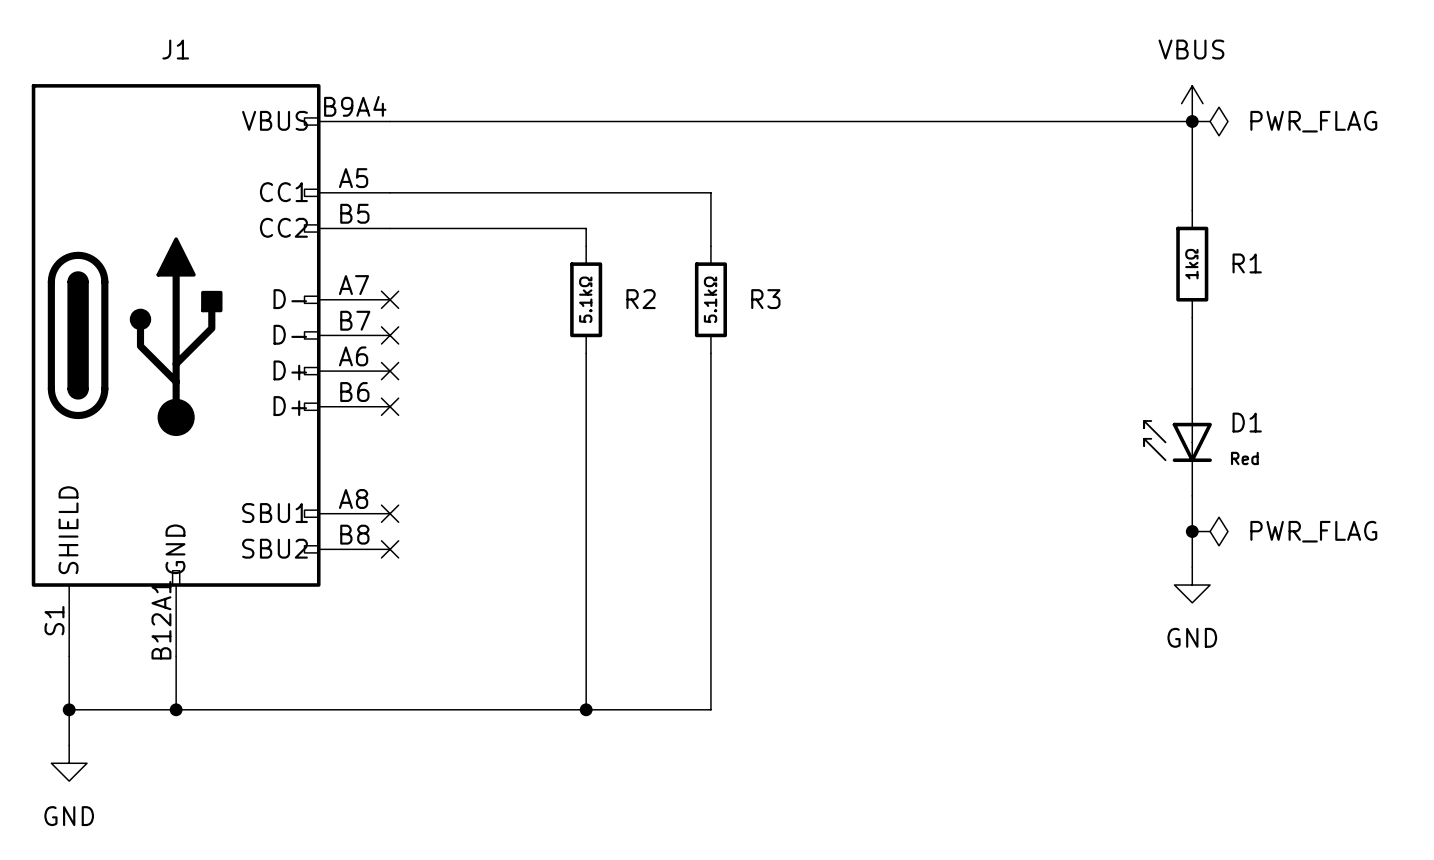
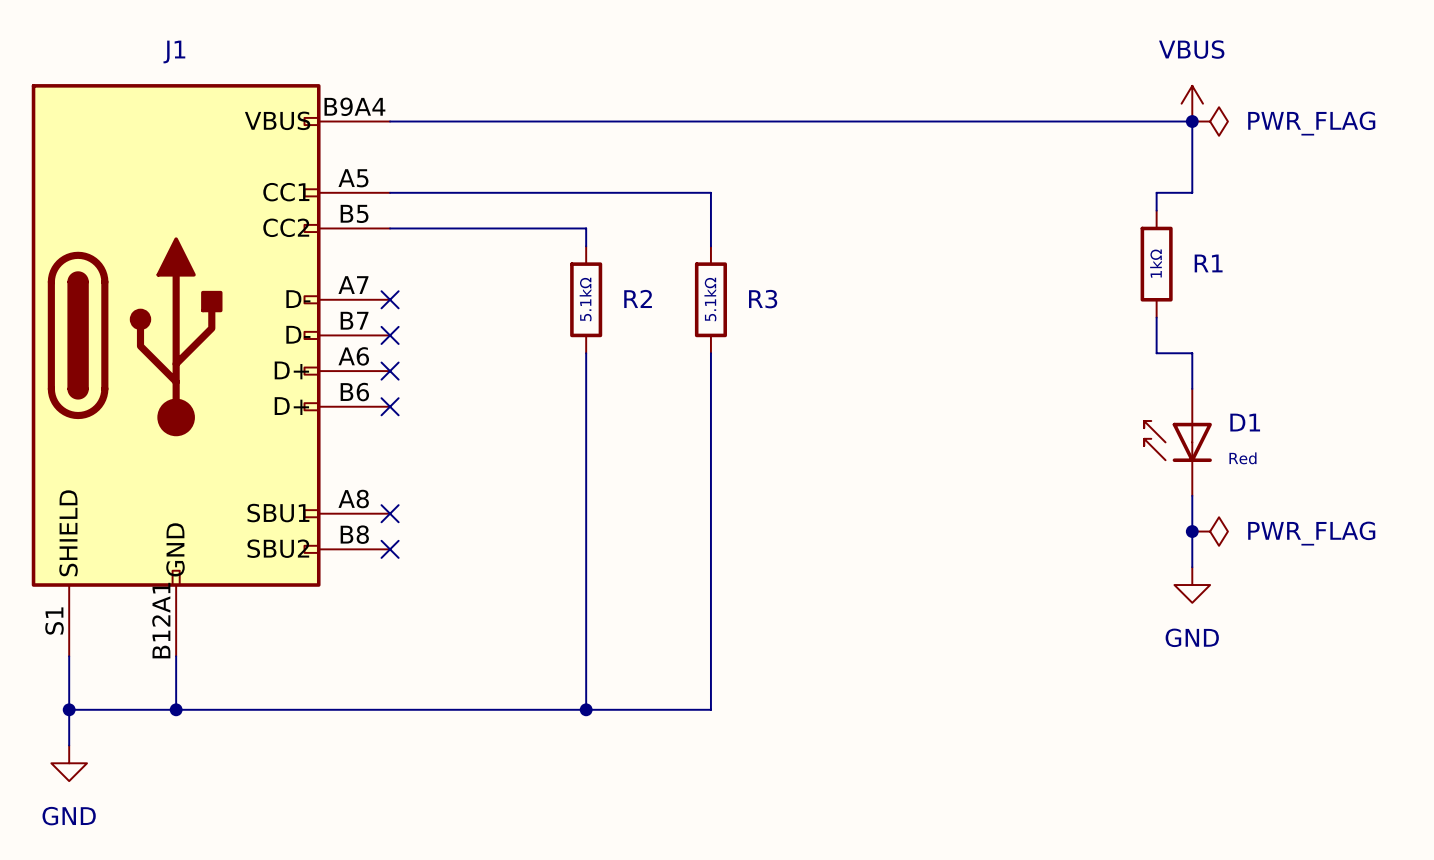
wire: (1192, 192) (1192, 210) -> (1192, 192) (1156, 192) (1156, 210)
R1 position: (1192, 264) -> (1156, 264)
wire: (1192, 317) (1192, 353) -> (1156, 317) (1156, 353) (1192, 353)

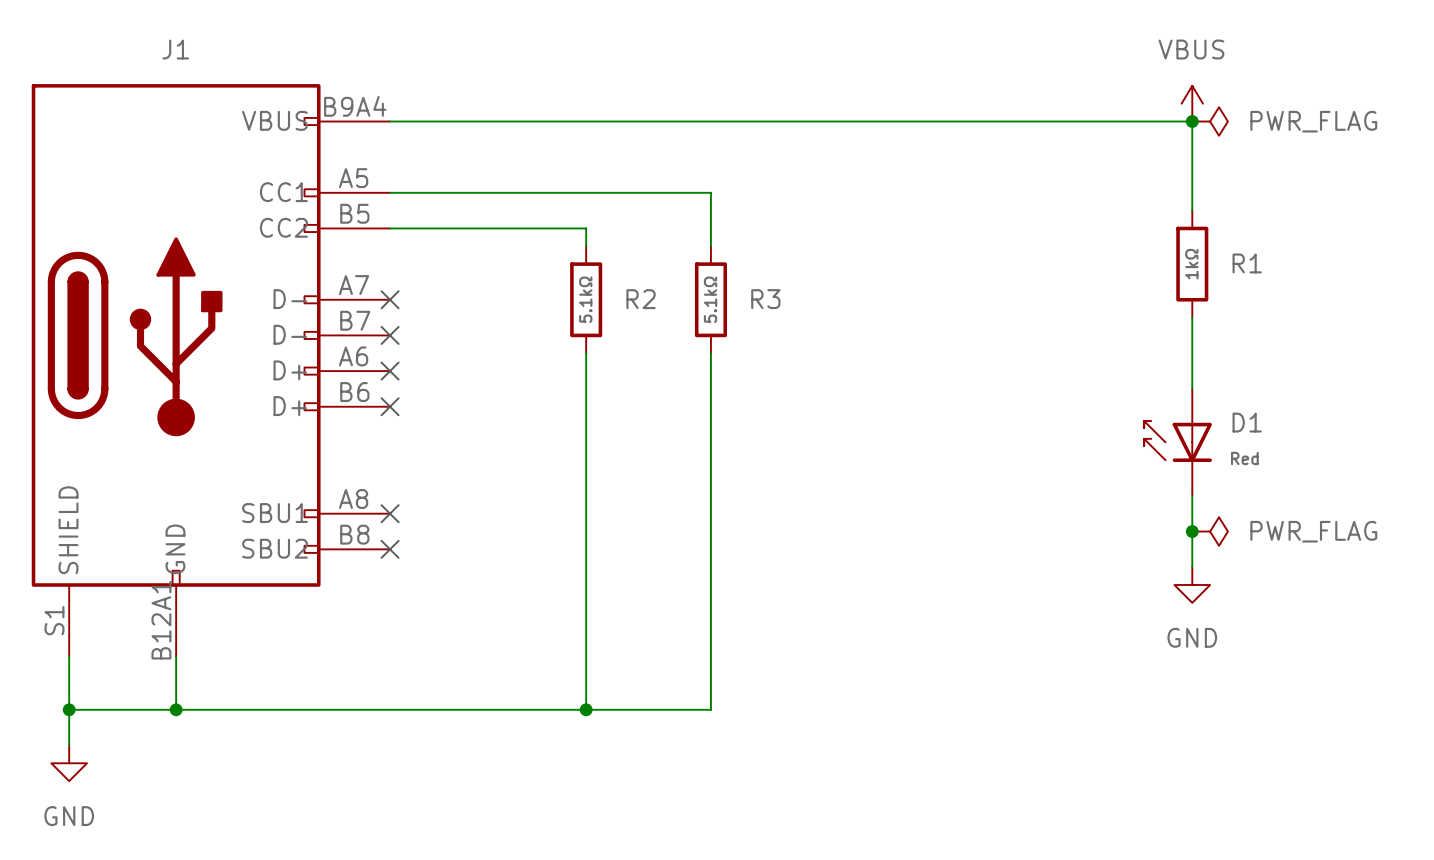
wire: (1192, 192) (1156, 192) (1156, 210) -> (1192, 192) (1192, 210)
R1 position: (1156, 264) -> (1192, 264)
wire: (1156, 317) (1156, 353) (1192, 353) -> (1192, 317) (1192, 353)

